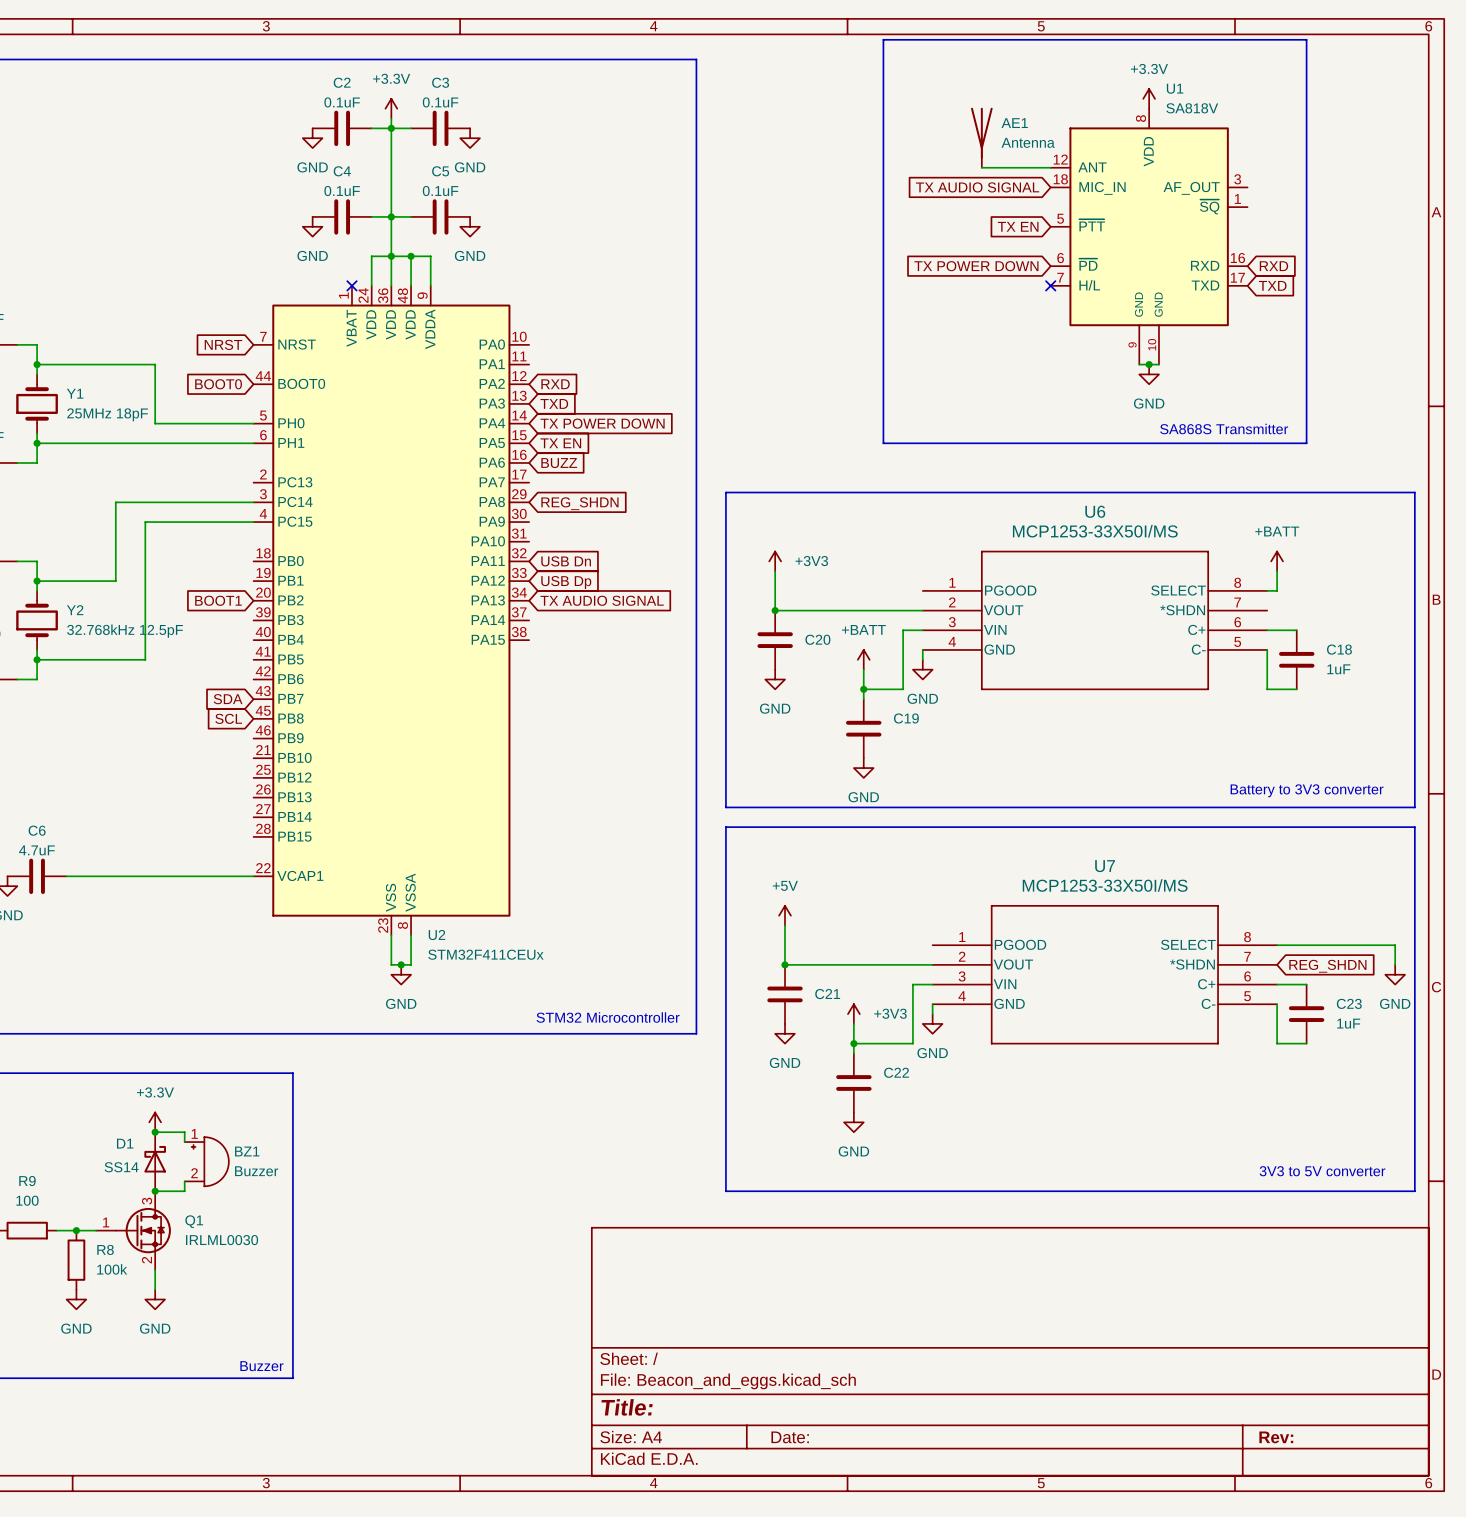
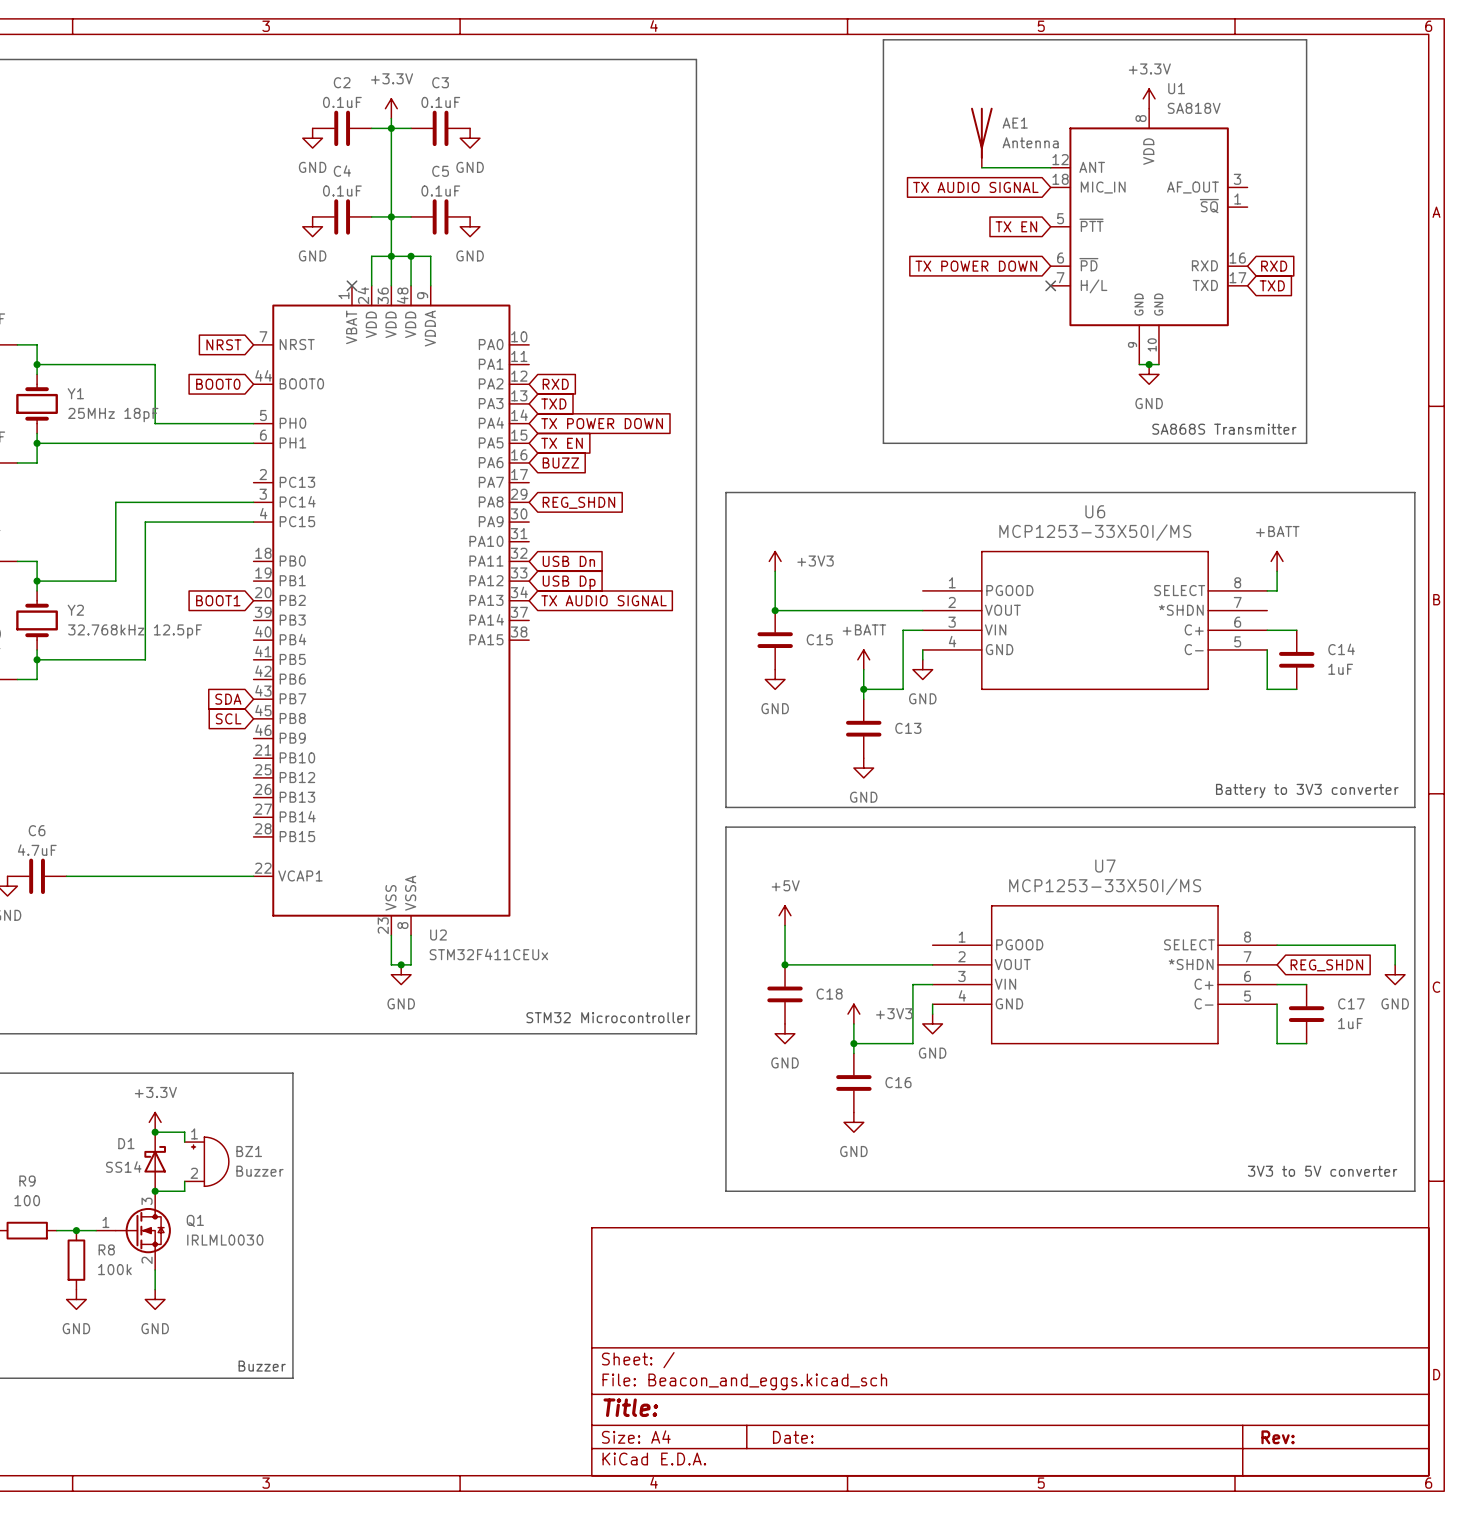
C20 name: C20 (817, 639) -> C15 (819, 639)
C18 name: C18 (1339, 649) -> C14 (1341, 649)
C19 name: C19 (906, 718) -> C13 (908, 728)
C21 name: C21 (827, 994) -> C18 (829, 994)
C23 name: C23 (1349, 1003) -> C17 (1351, 1003)
C22 name: C22 (896, 1072) -> C16 (898, 1082)

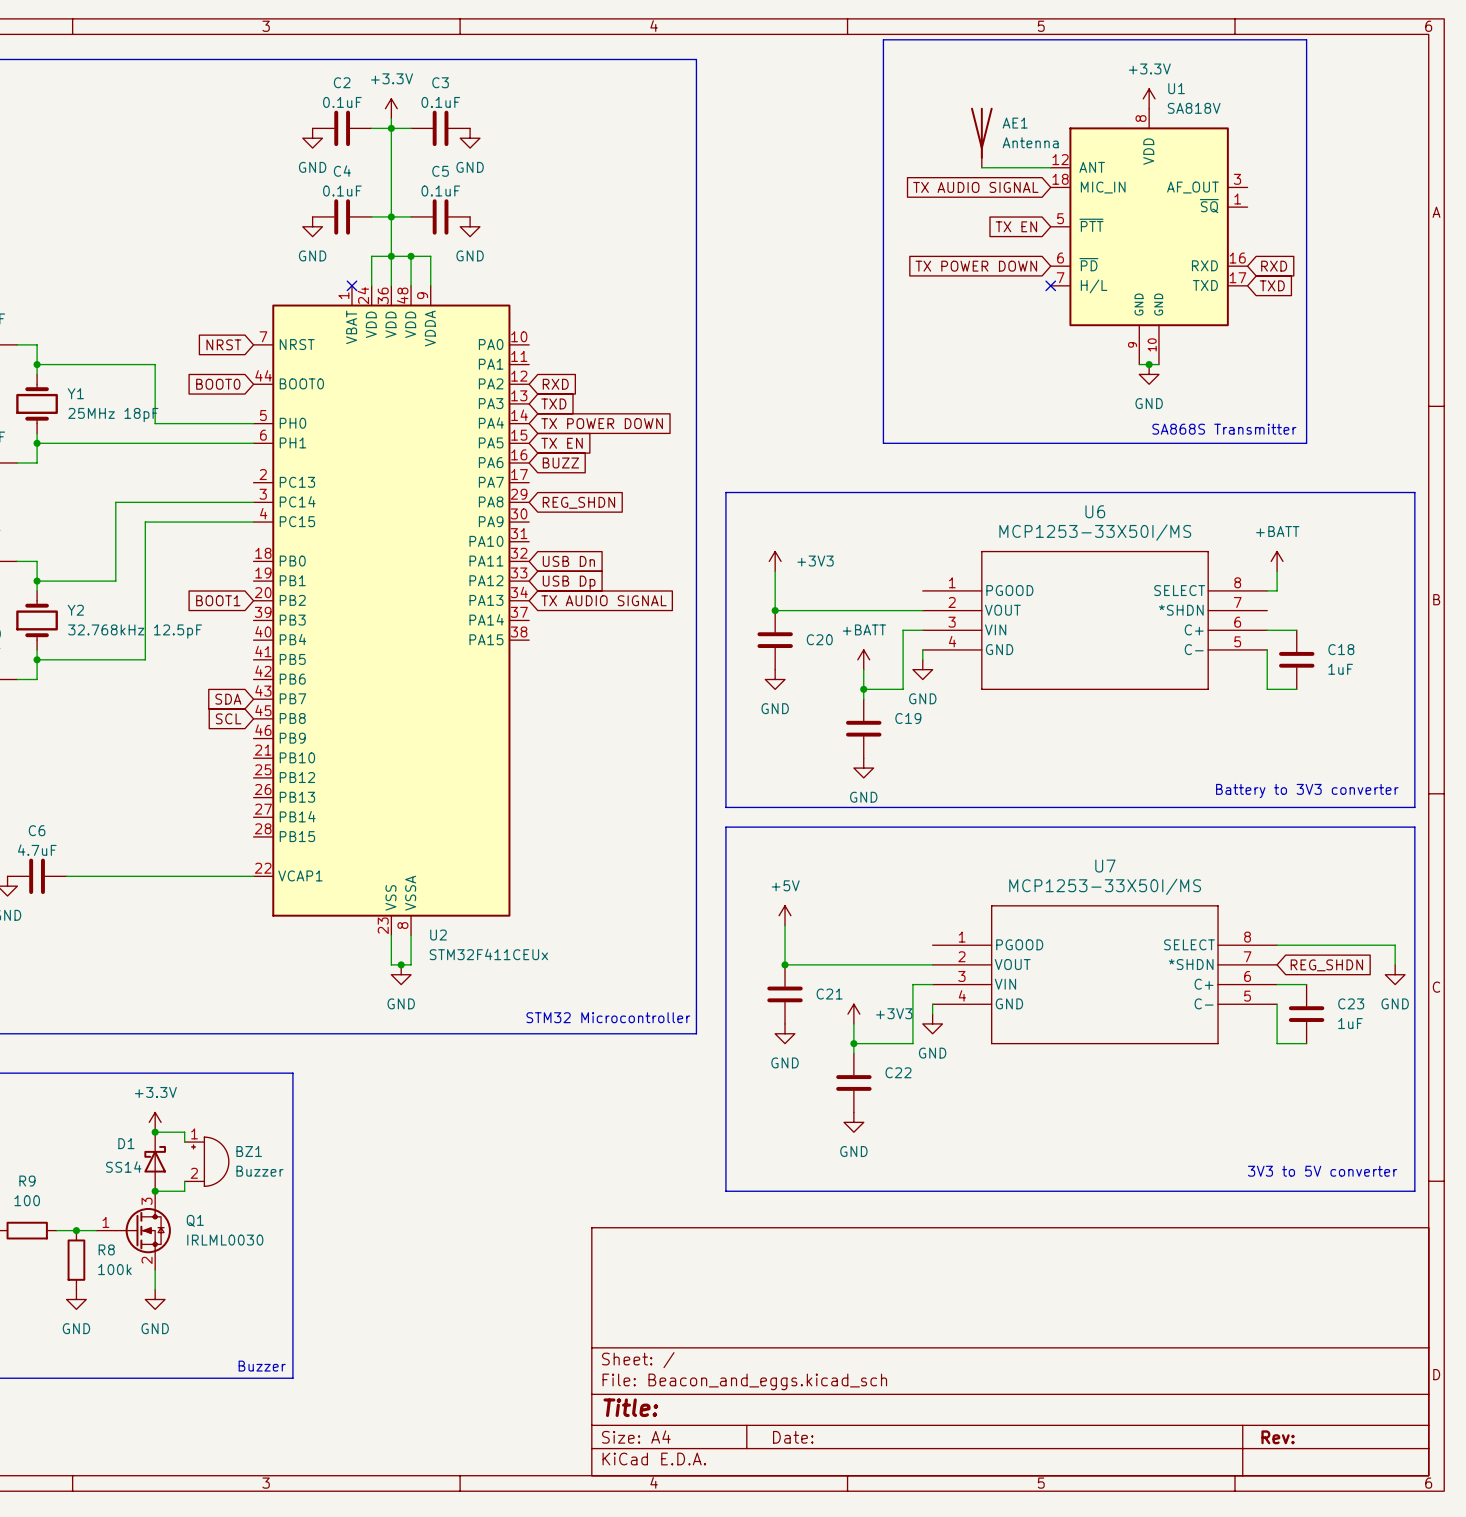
C15 name: C15 (819, 639) -> C20 (819, 639)
C14 name: C14 (1341, 649) -> C18 (1341, 649)
C13 name: C13 (908, 728) -> C19 (908, 718)
C18 name: C18 (829, 994) -> C21 (829, 994)
C17 name: C17 (1351, 1003) -> C23 (1351, 1003)
C16 name: C16 (898, 1082) -> C22 (898, 1072)

